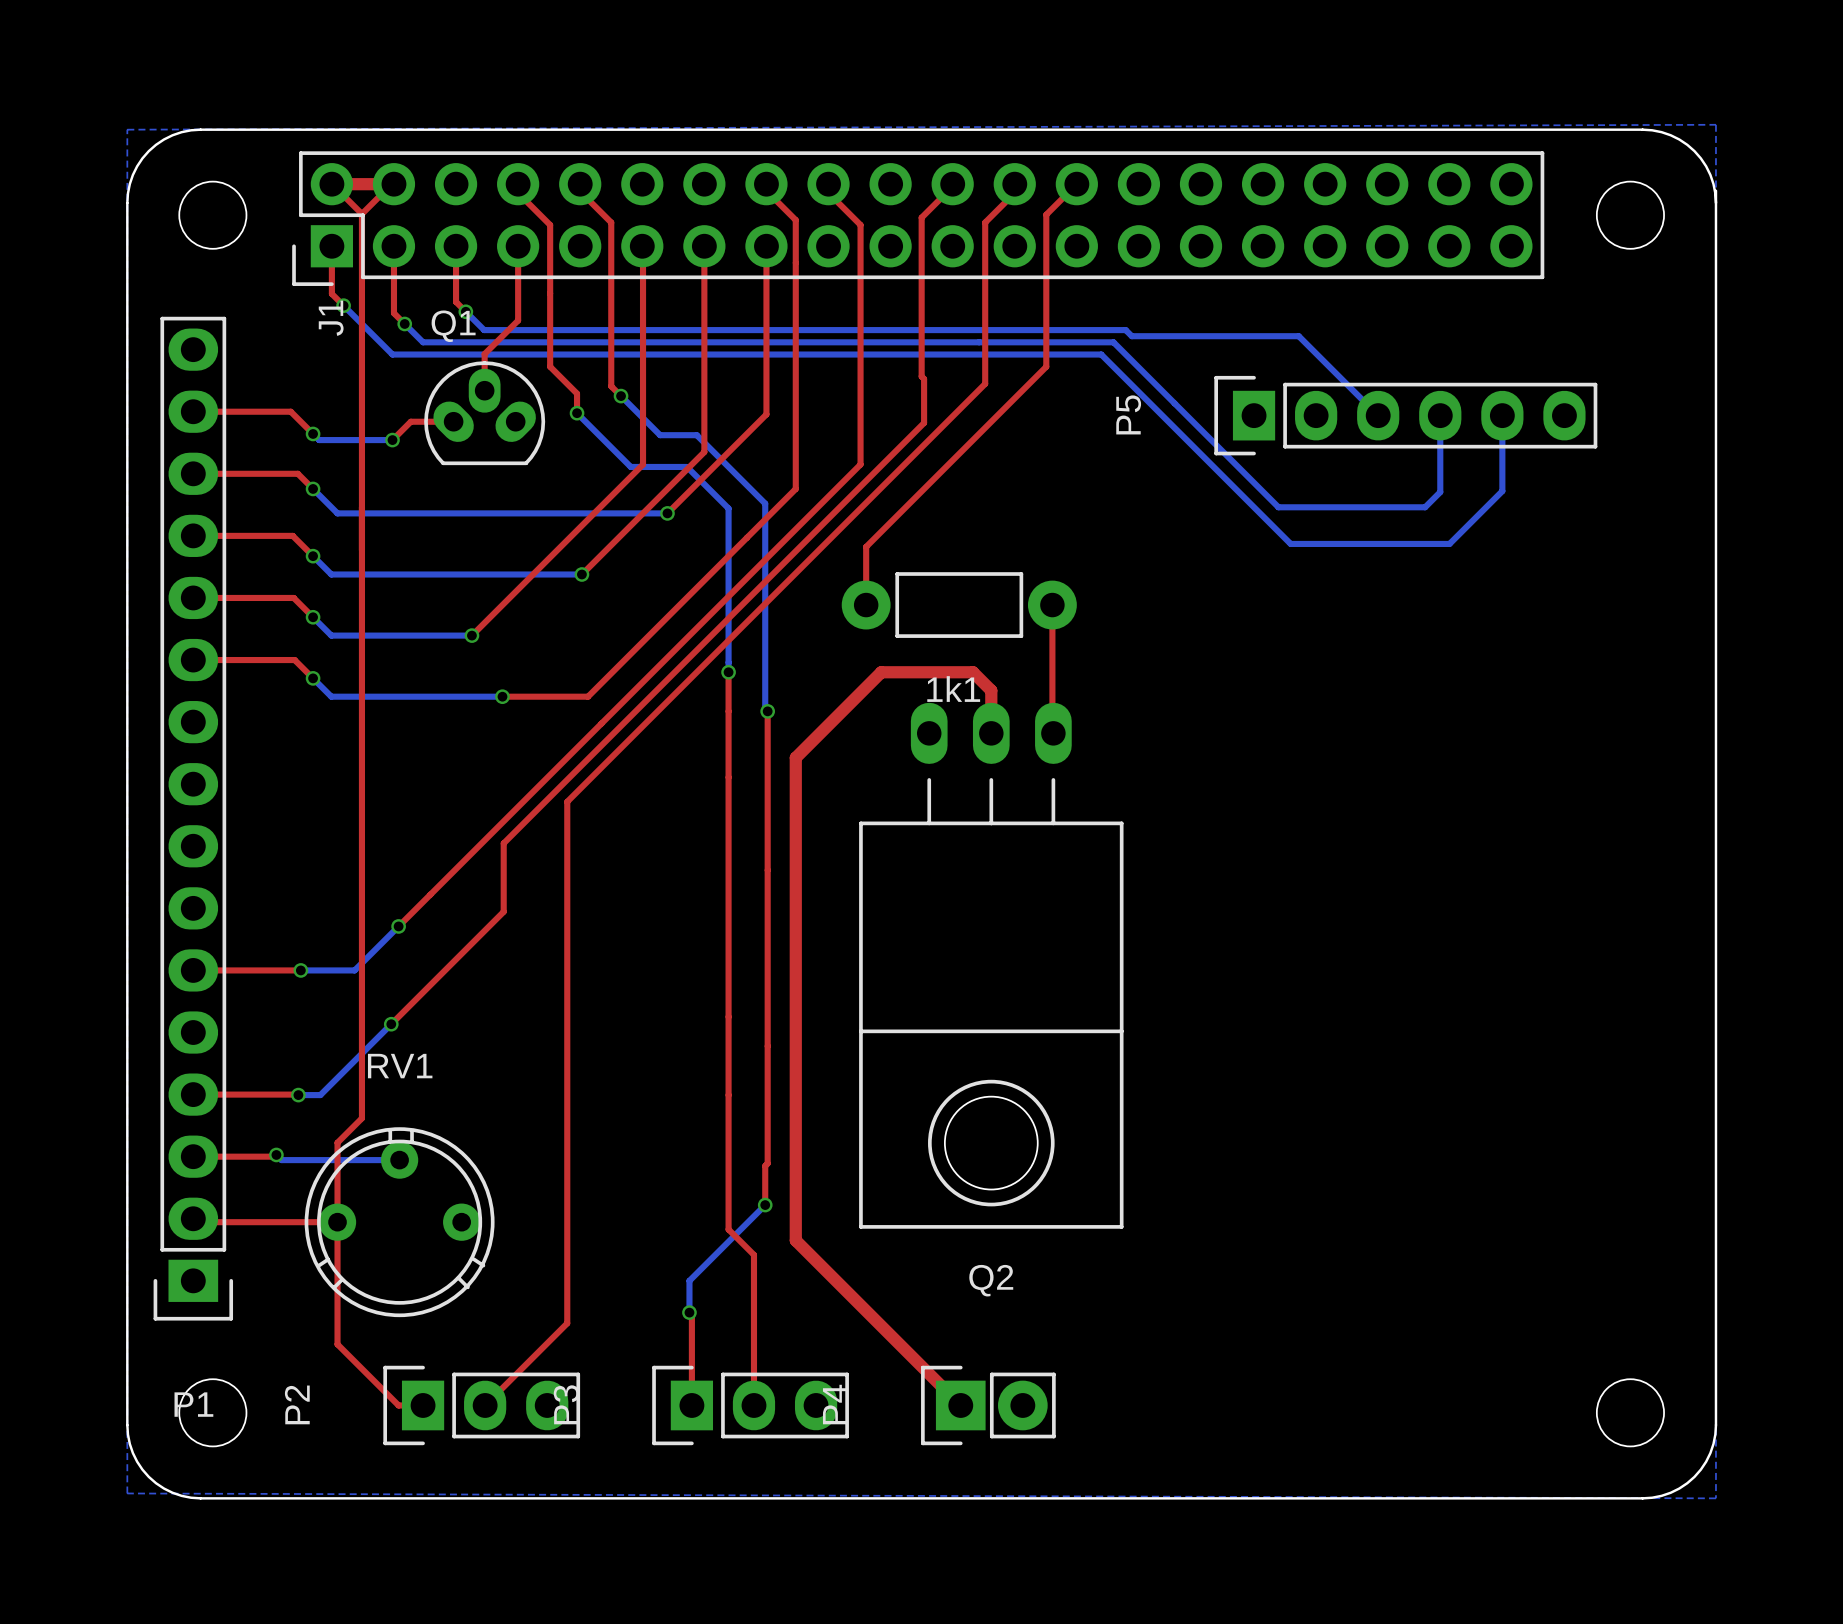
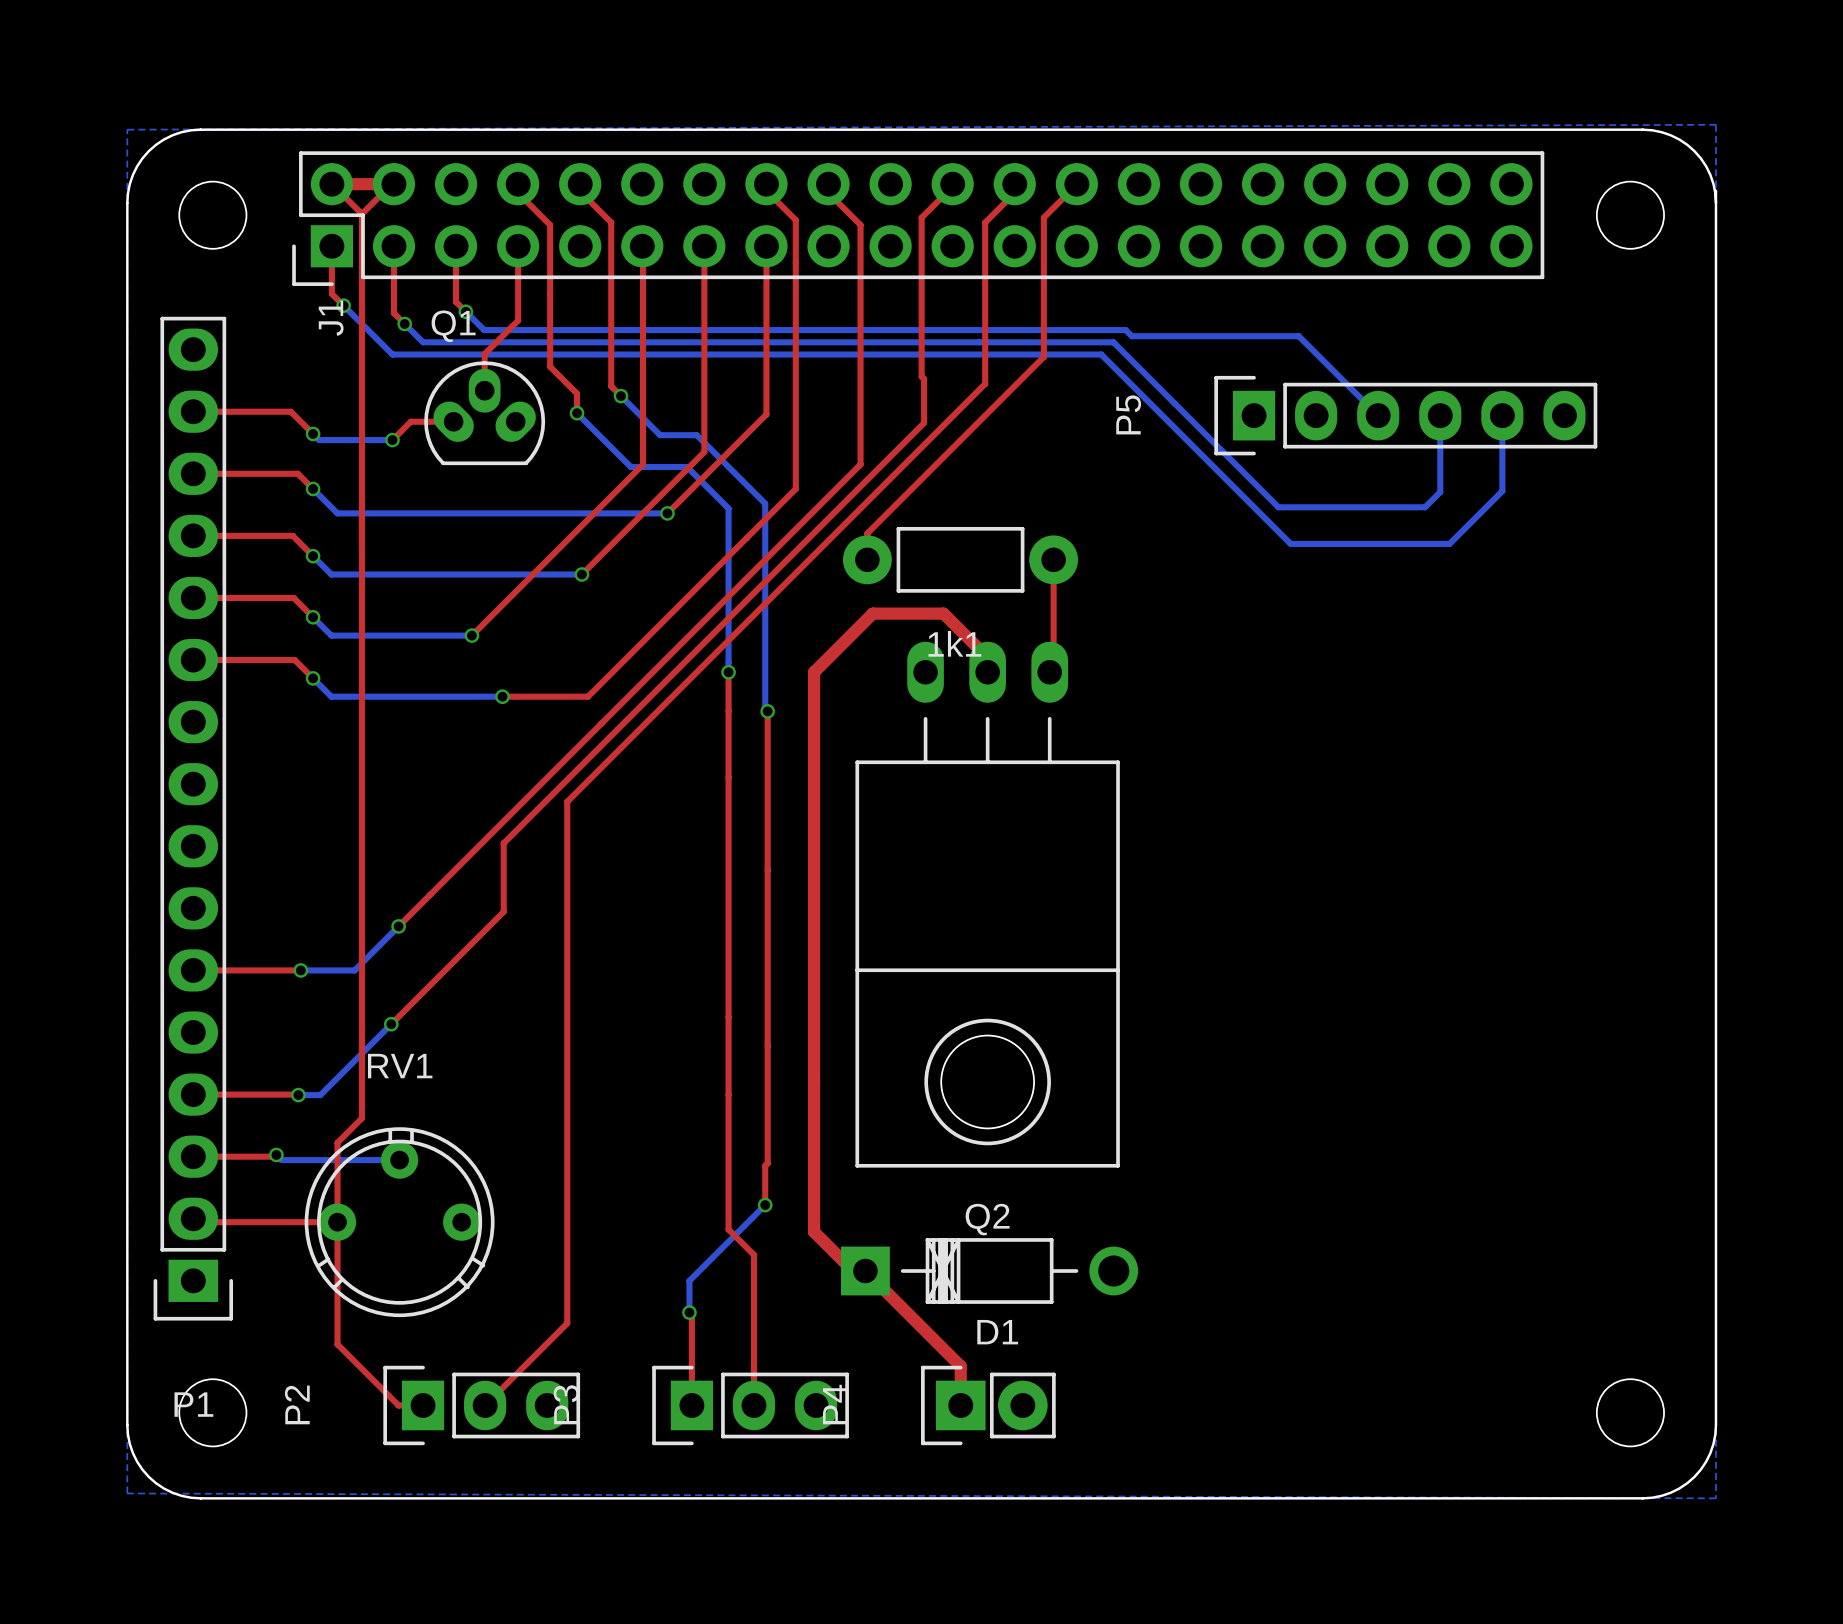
top track: (1076, 184) (1046, 214) (1046, 366) (866, 546) (866, 605) -> (1076, 184) (1043, 217) (1043, 356) (867, 533) (867, 559)
top track: none -> (1053, 559) (1053, 668) (1049, 672)
1k1 position: (959, 605) -> (960, 559)
top track: (1052, 605) (1053, 733) -> none
top track: (991, 733) (991, 690) (972, 672) (881, 672) (795, 757) (795, 1240) (960, 1405) -> (987, 672) (987, 657) (943, 613) (872, 613) (814, 672) (814, 1231) (853, 1271) (865, 1271) (960, 1366) (960, 1405)
Q2 position: (991, 965) -> (987, 904)
D1: none -> (989, 1271)

